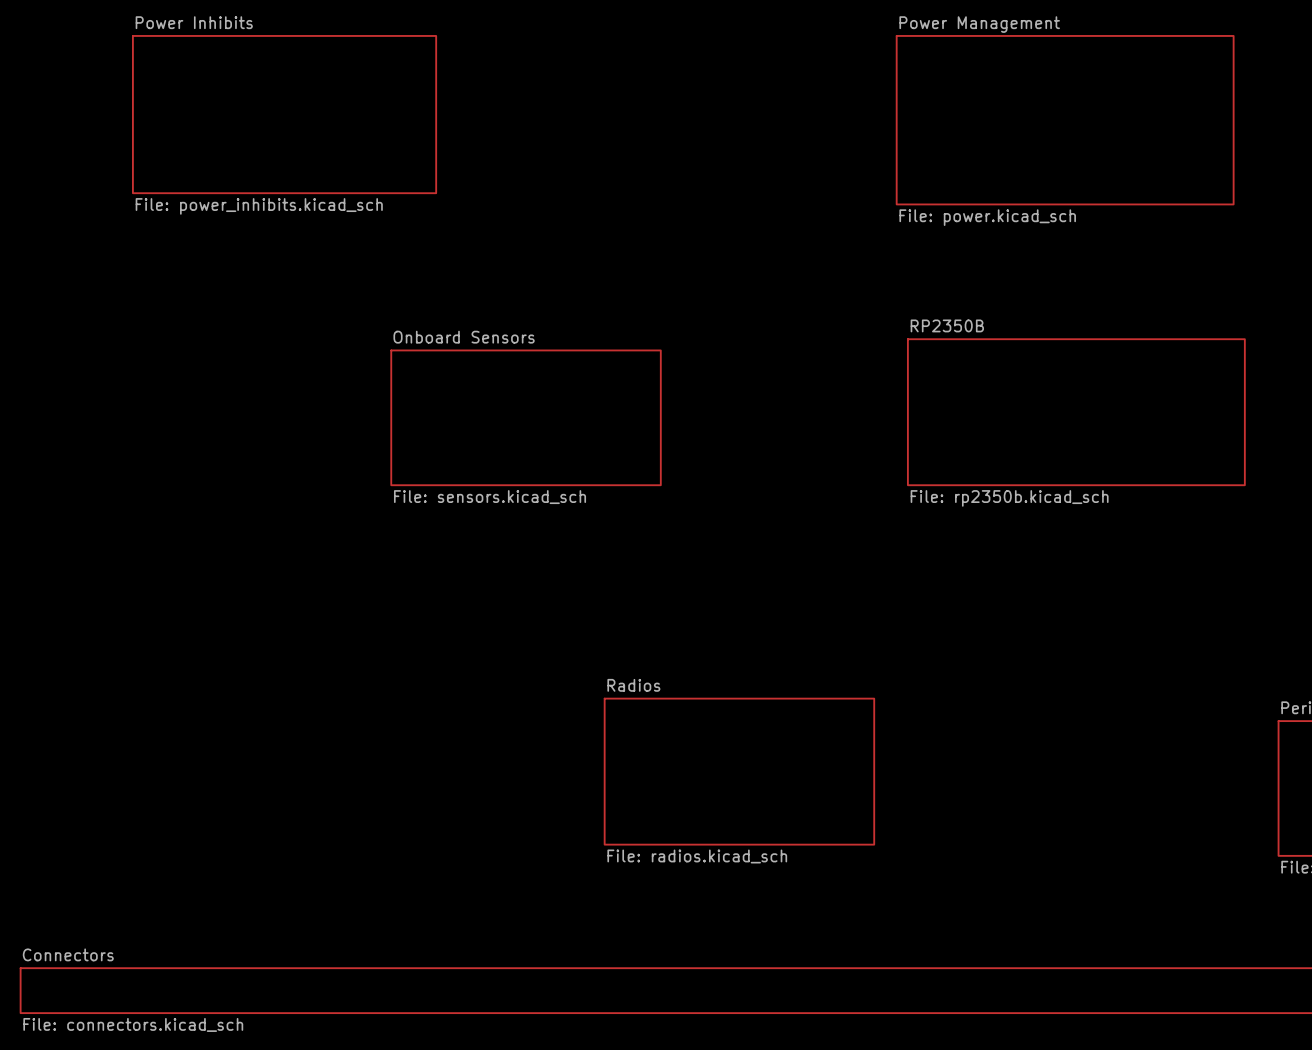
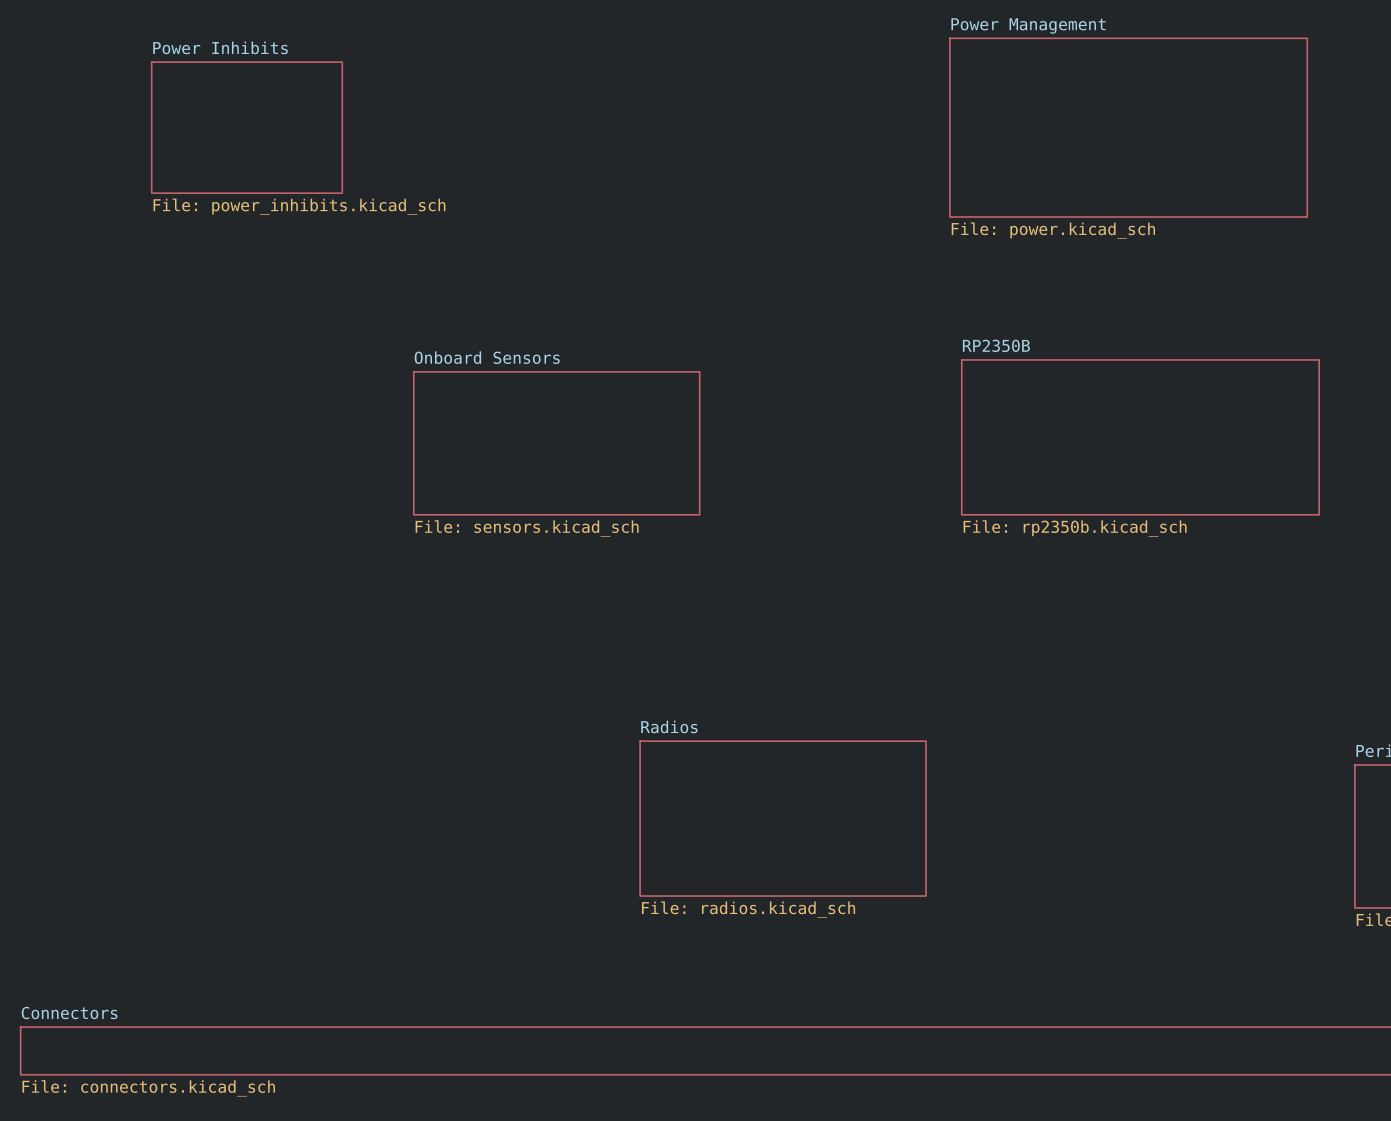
sheet Power Inhibits: File: power_inhibits.kicad_sch (284, 114) -> none
sheet Power Inhibits: none -> File: power_inhibits.kicad_sch (246, 127)

